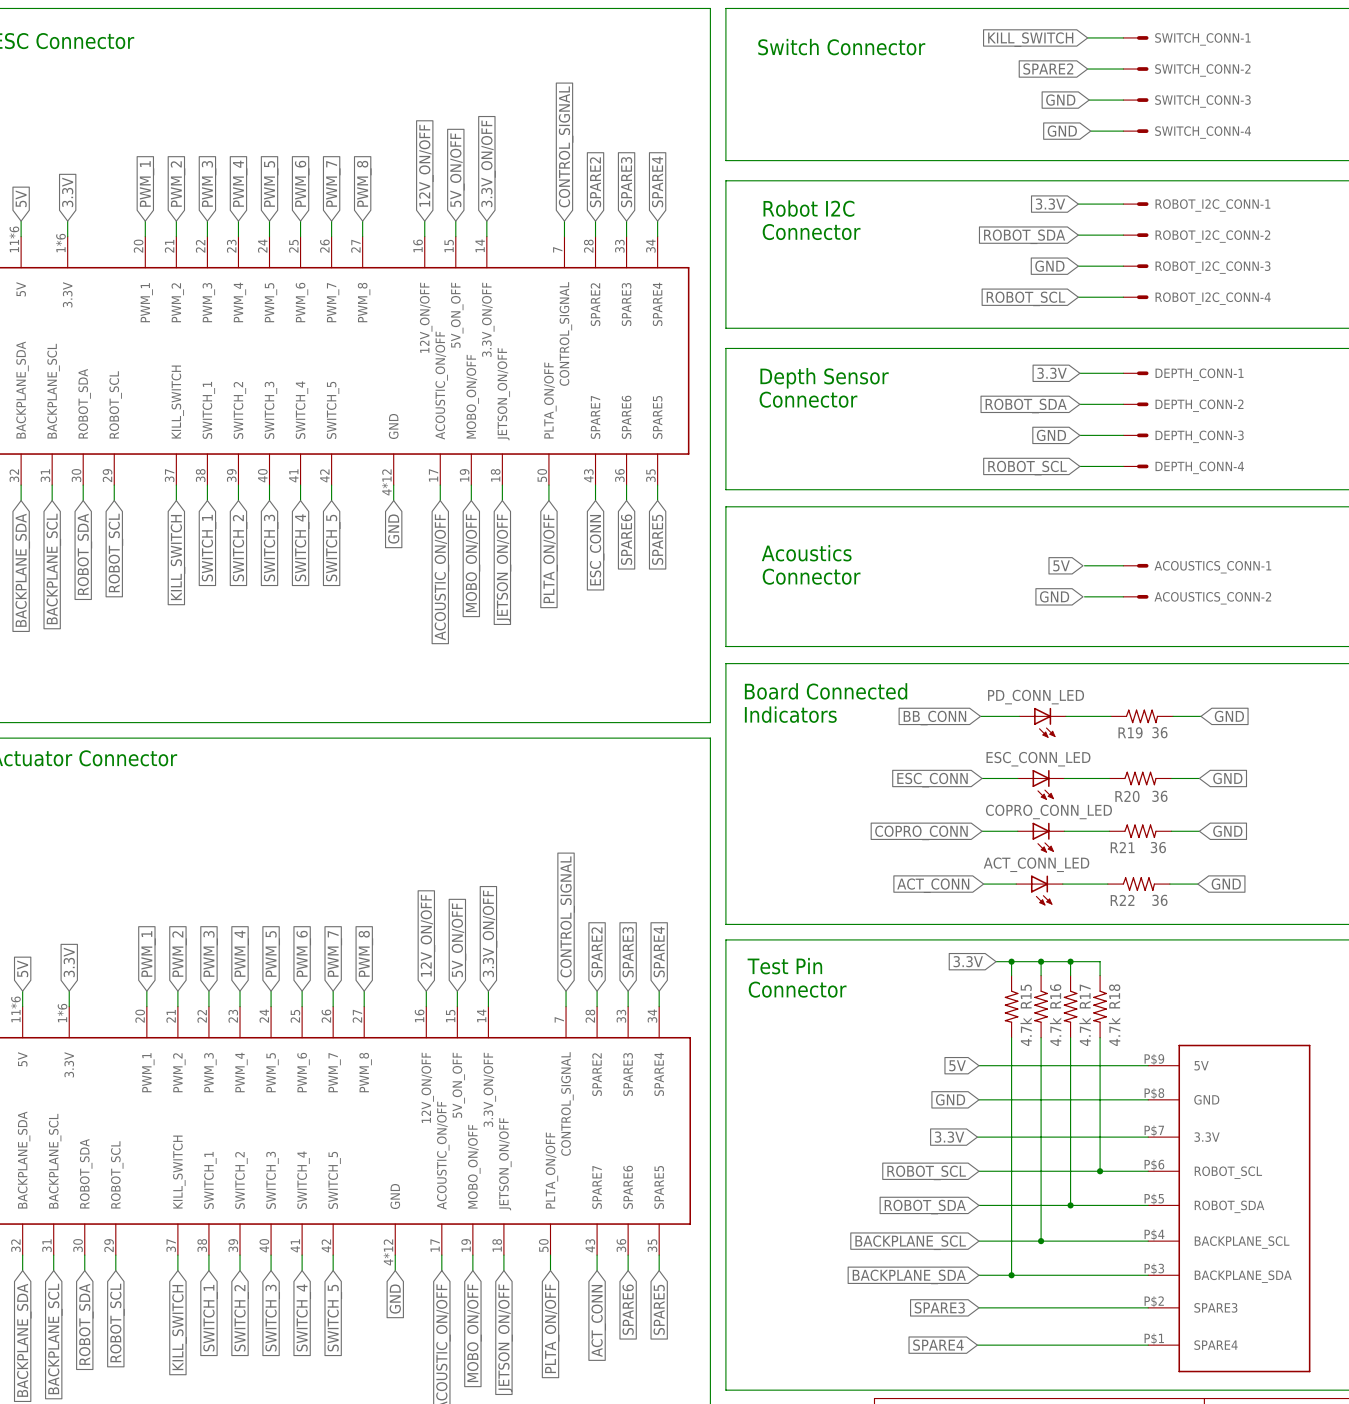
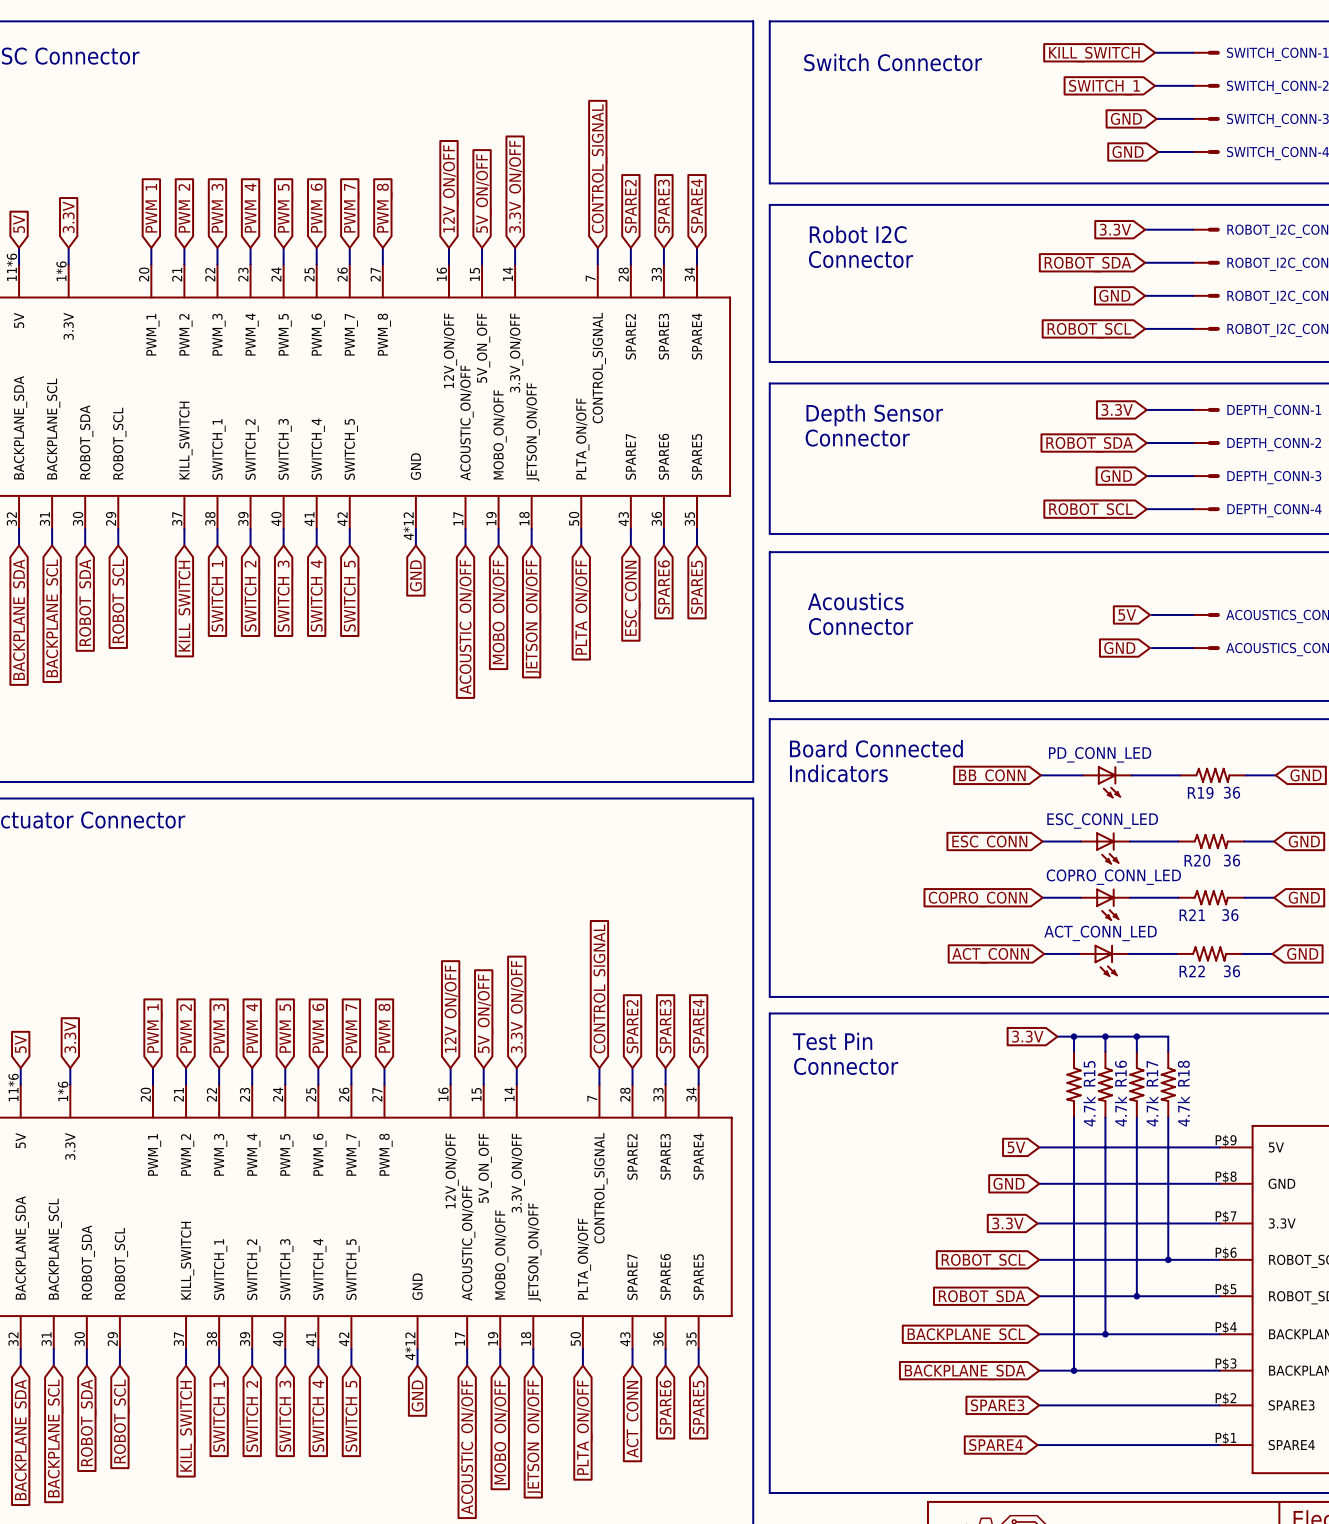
global label: SPARE2 (1048, 69) -> SWITCH_1 (1104, 87)

